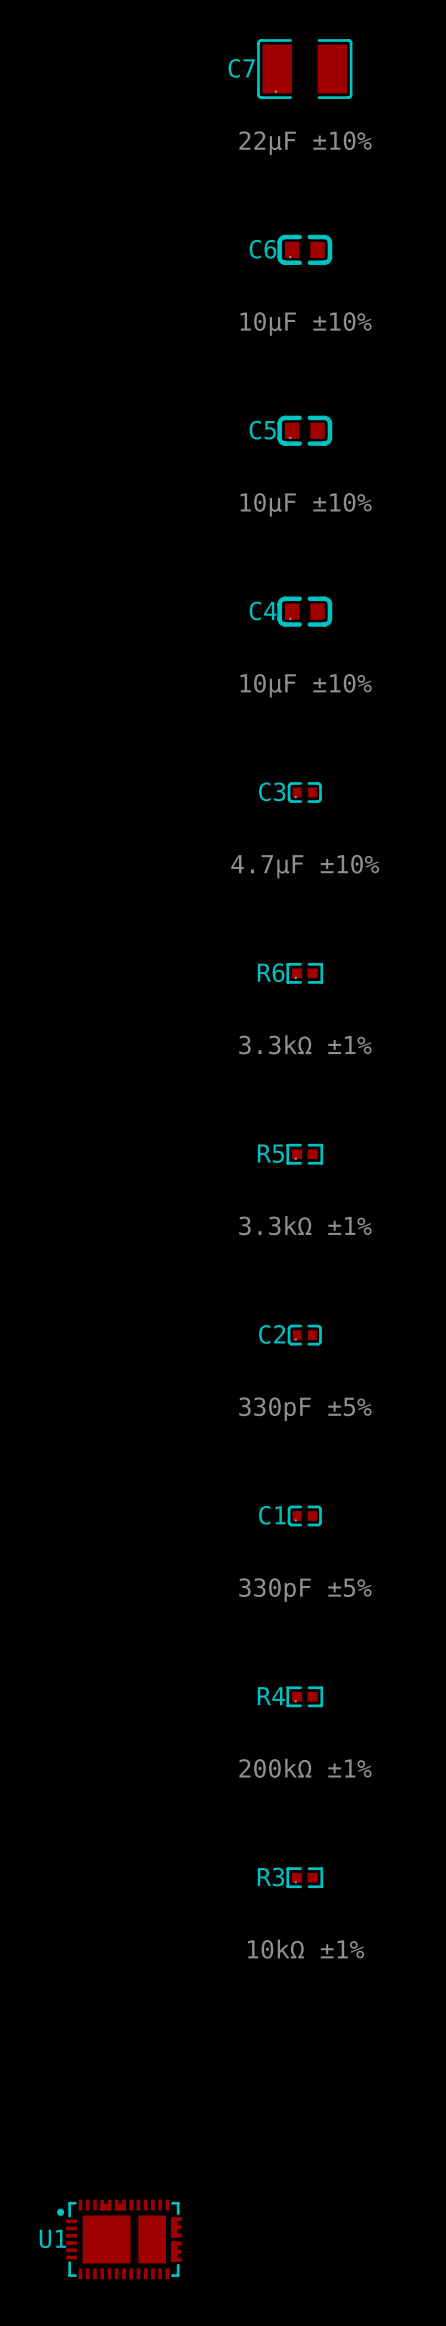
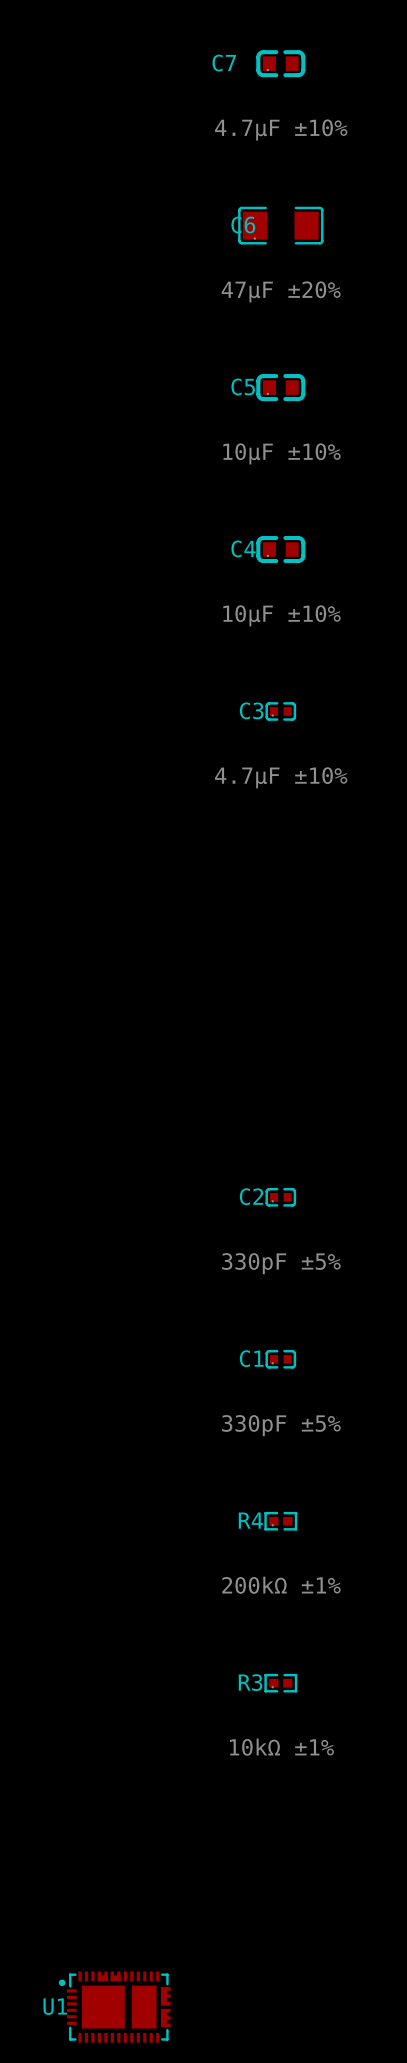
C7 footprint: [257, 39, 353, 99] -> [256, 50, 306, 78]
C7 value: 22µF ±10% (305, 143) -> 4.7µF ±10% (281, 130)
C6 footprint: [277, 234, 333, 266] -> [238, 206, 324, 245]
C6 value: 10µF ±10% (306, 324) -> 47µF ±20% (281, 291)
R6: 3.3kΩ ±1% (304, 973) -> none
R5: 3.3kΩ ±1% (304, 1154) -> none

